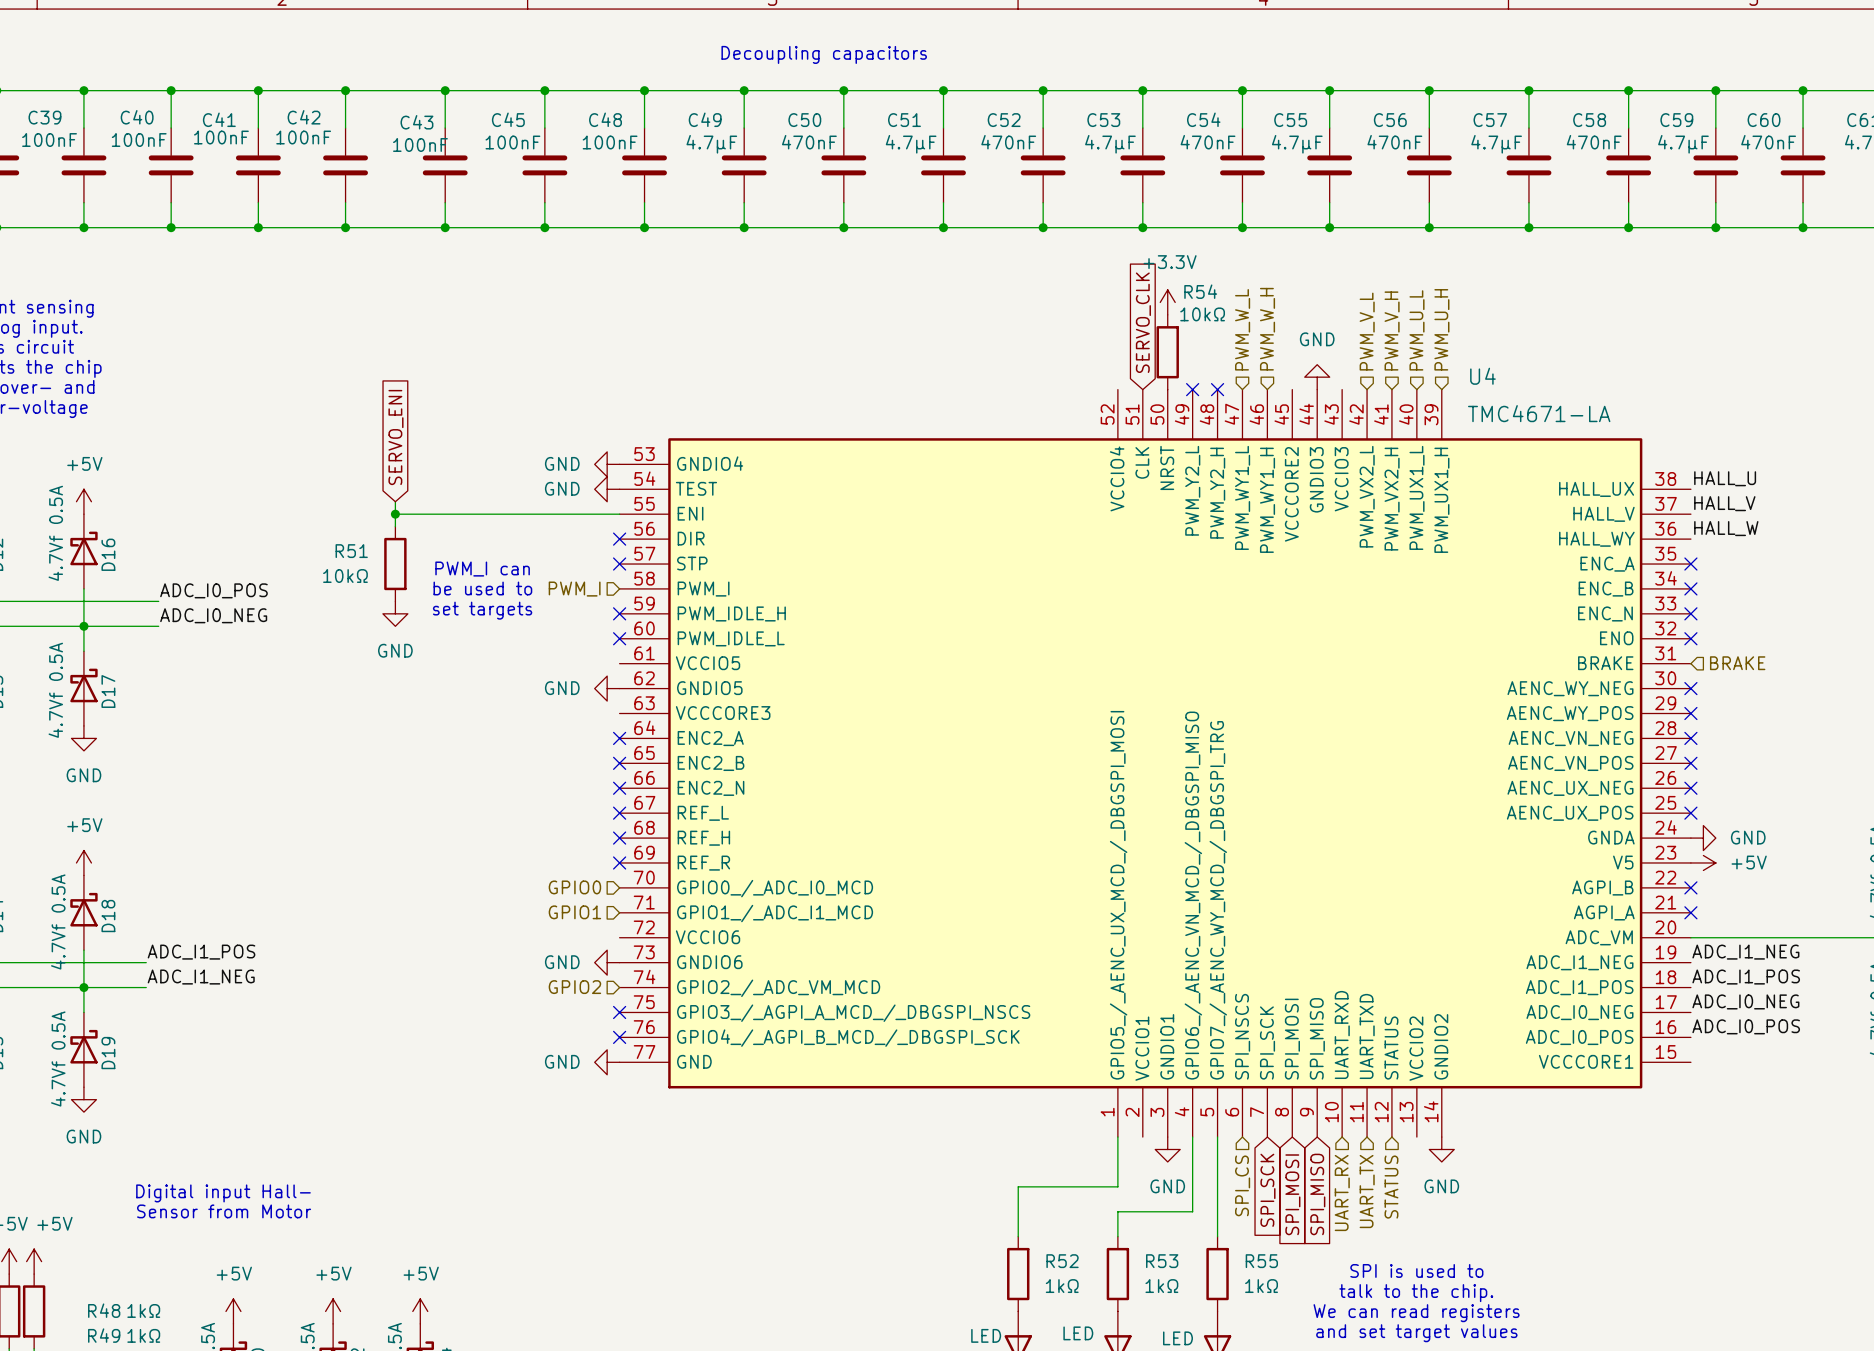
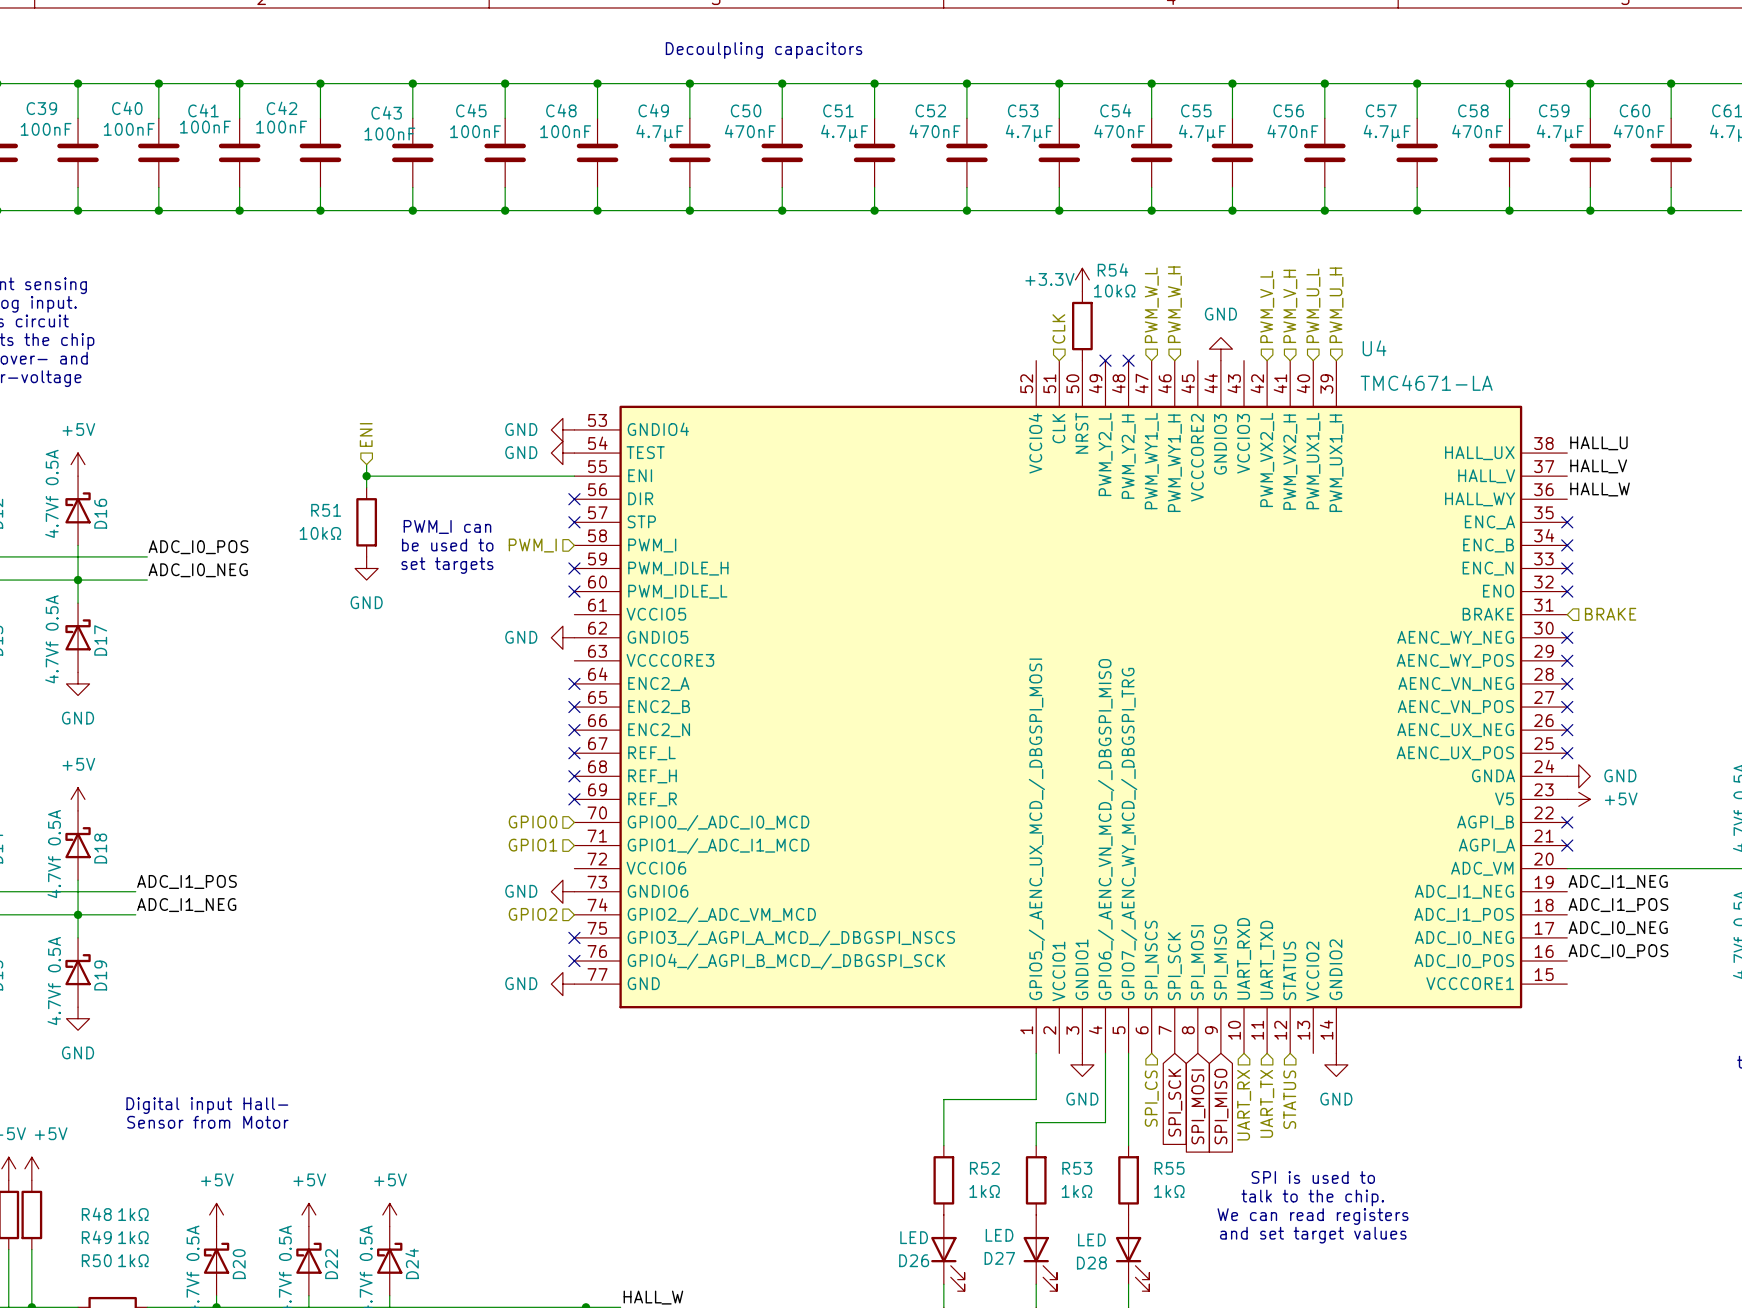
text: Decoupling capacitors (824, 54) -> Decoulpling capacitors (764, 50)
power symbol text position: +3.3V (1170, 262) -> +3.3V (1049, 279)
global label: SERVO_CLK (1143, 322) -> none
hierarchical label: none -> CLK (1058, 328)
global label: SERVO_ENI (395, 437) -> none
hierarchical label: none -> ENI (366, 435)

